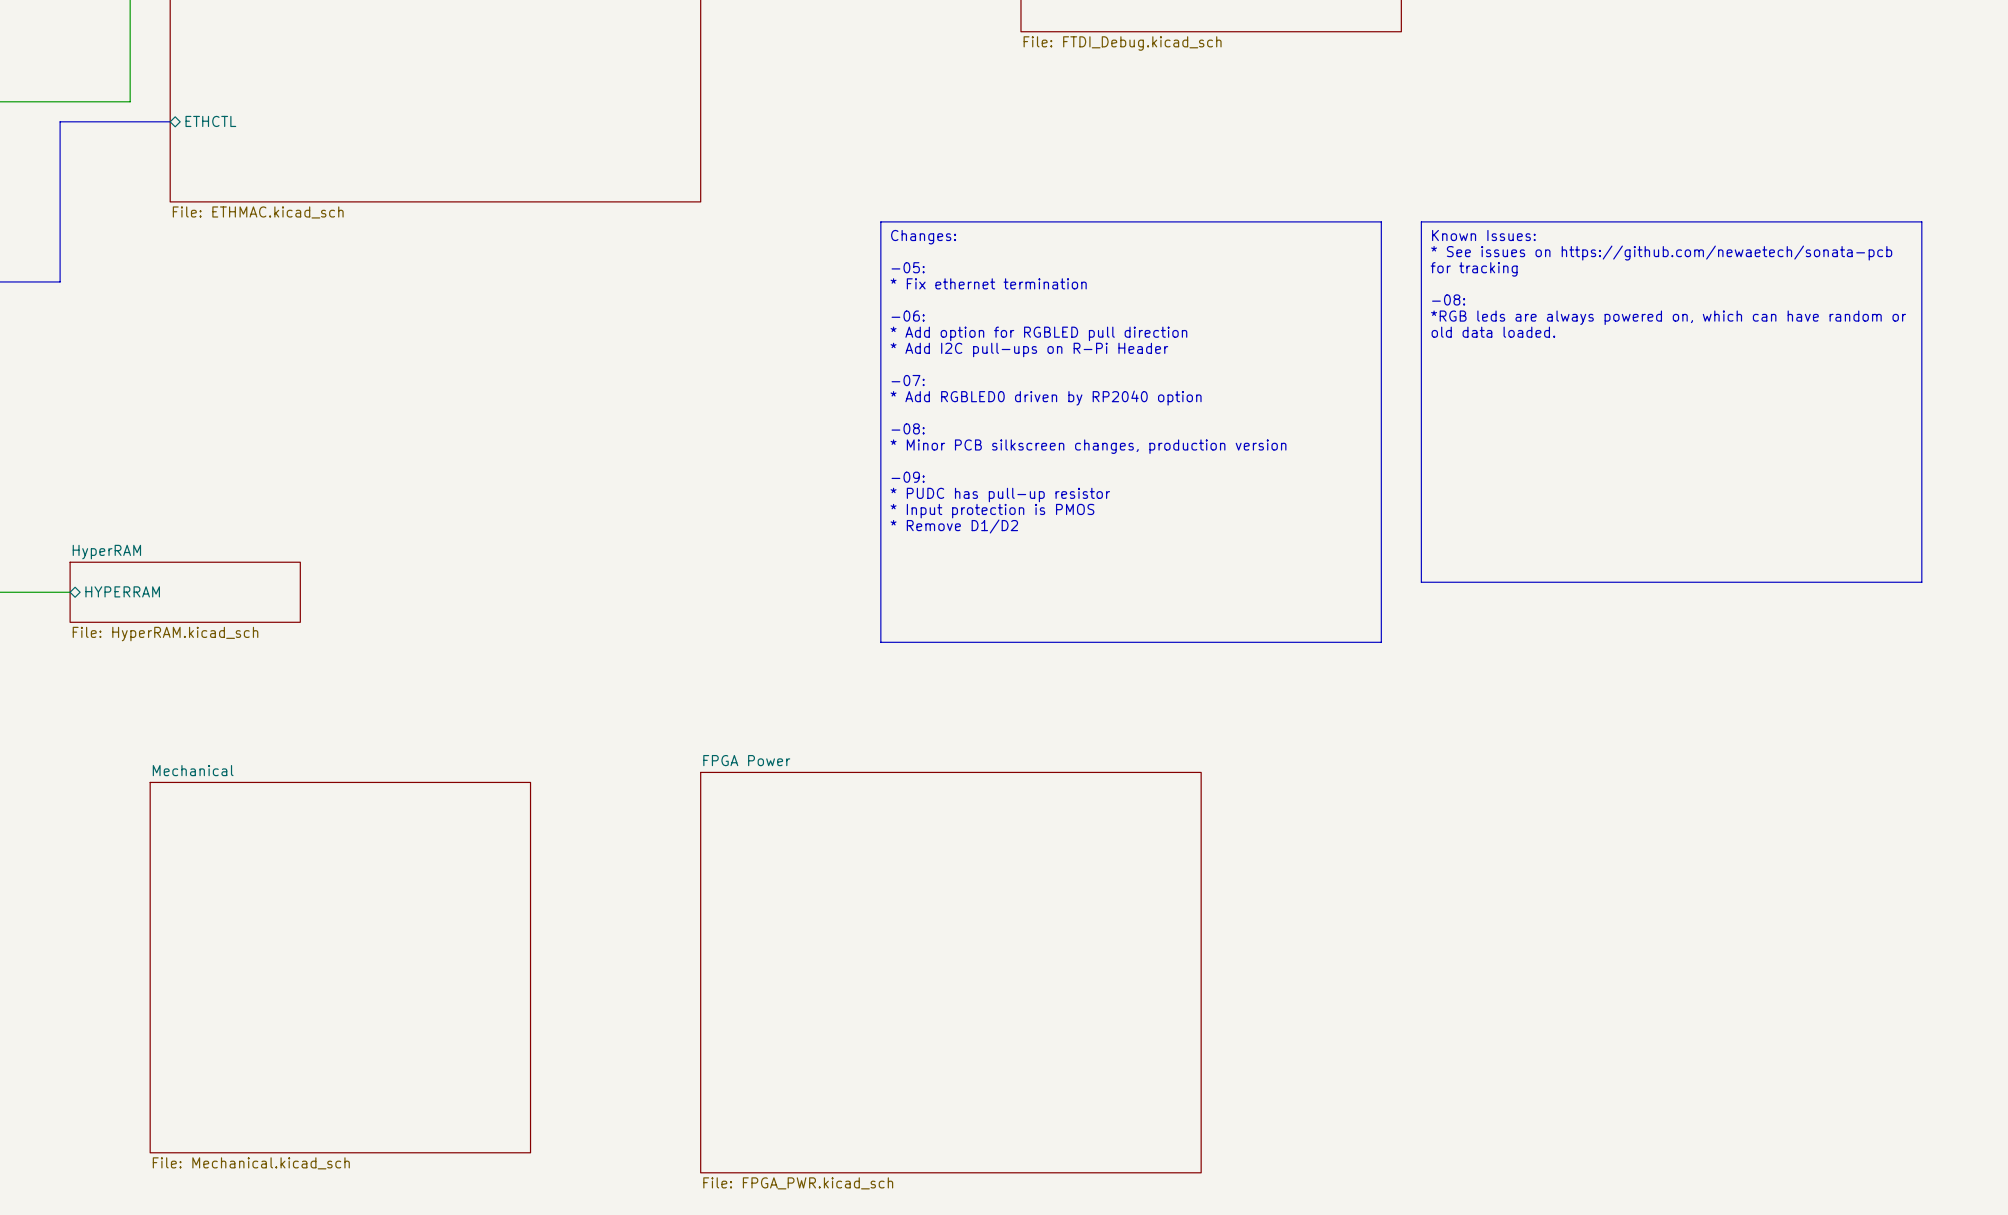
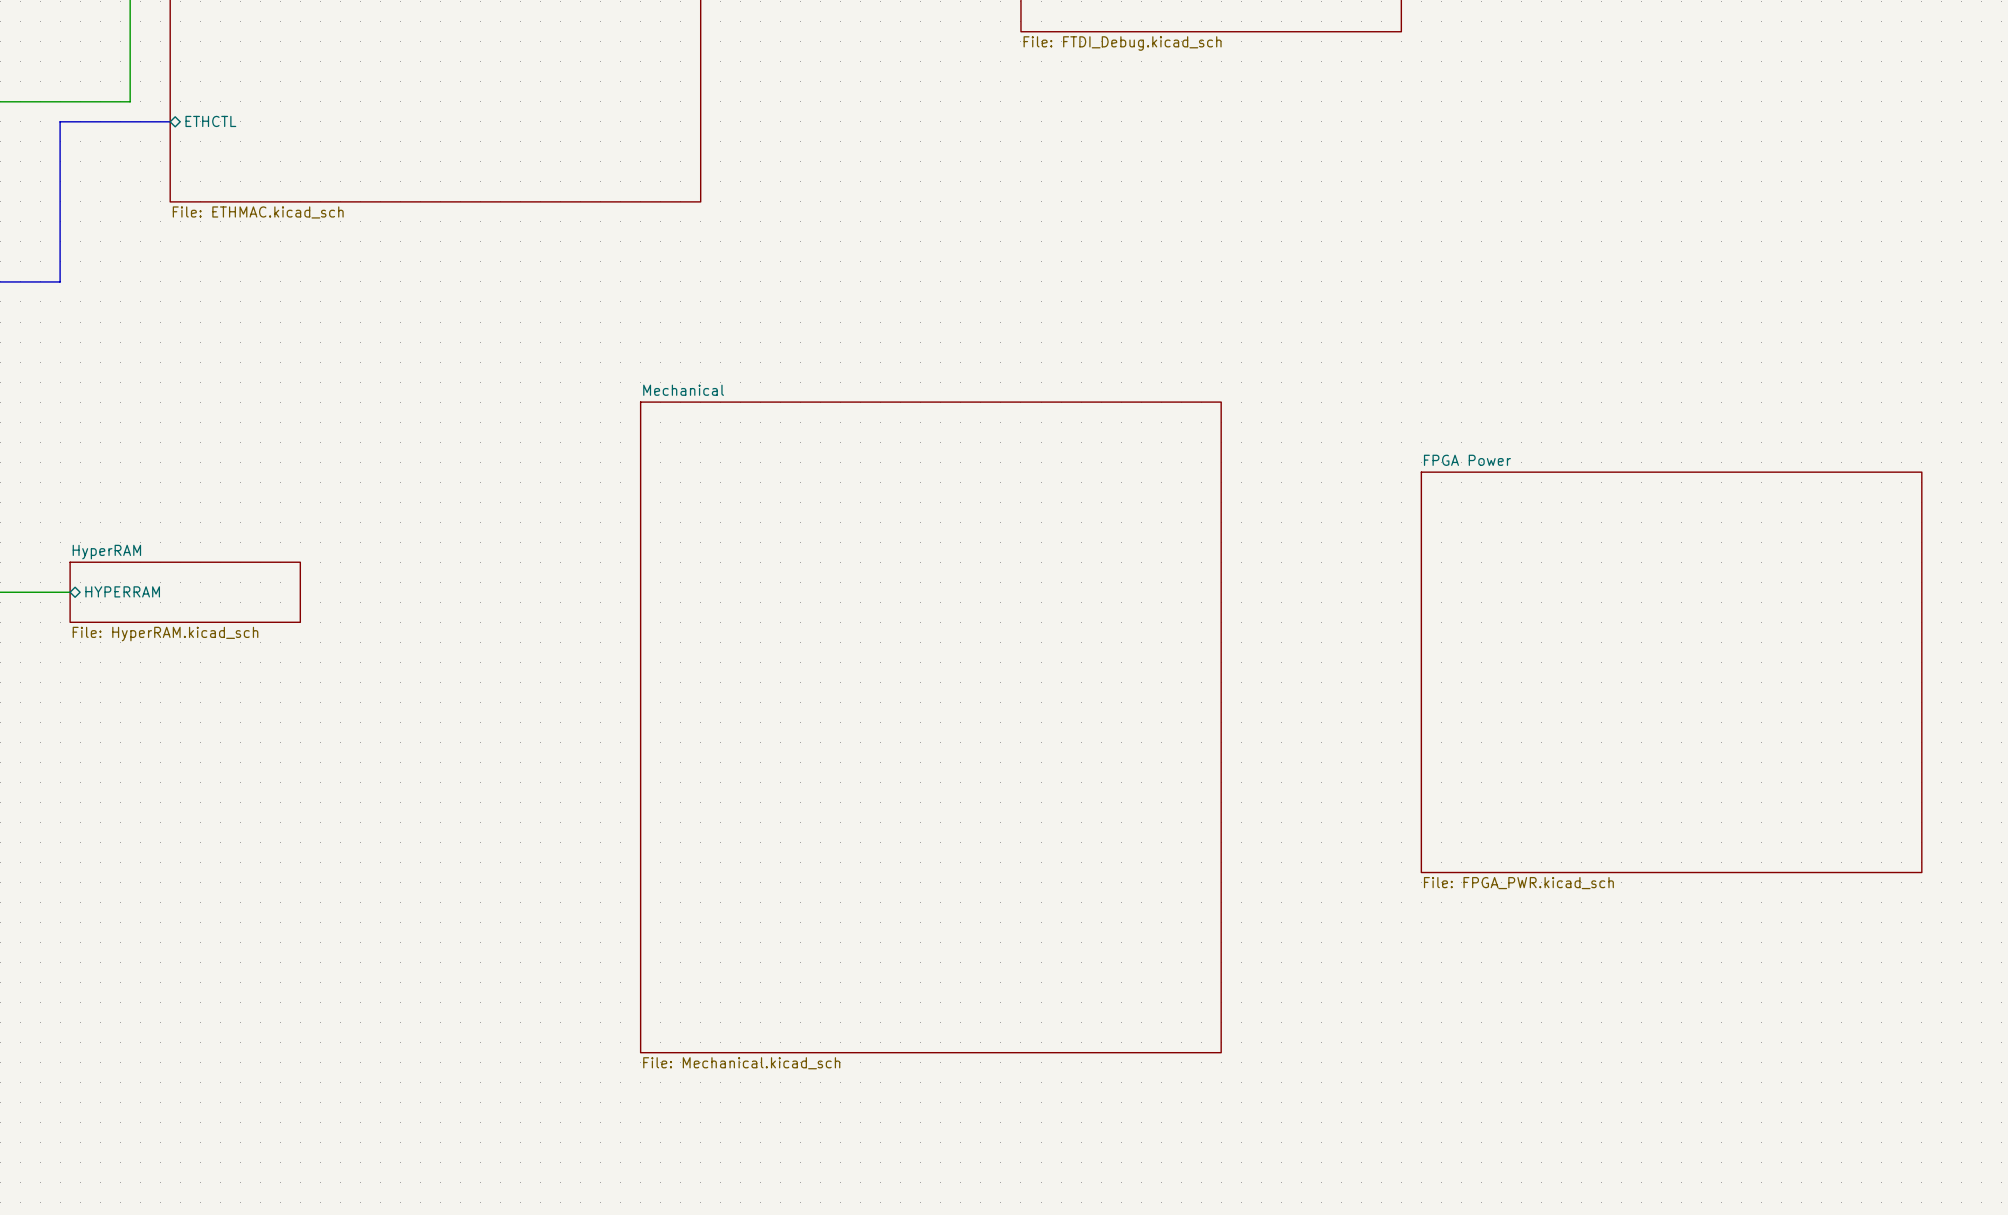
line: (880, 221) (1381, 221) (1381, 642) (880, 642) (880, 221) -> none
line: (1421, 221) (1921, 221) (1921, 582) (1421, 582) (1421, 221) -> none
text: Known Issues: (1483, 235) -> none
text: Changes: (923, 237) -> none
text: * See issues on https://github.com/newaetech/sonata-pcb (1661, 253) -> none
text: -05: (908, 267) -> none
text: for tracking (1474, 269) -> none
text: * Fix ethernet termination (988, 283) -> none
text: -08: (1448, 299) -> none
text: -06: (908, 316) -> none
text: *RGB leds are always powered on, which can have random or (1668, 317) -> none
text: old data loaded. (1493, 332) -> none
text: * Add option for RGBLED pull direction (1038, 333) -> none
text: * Add I2C pull-ups on R-Pi Header (1029, 349) -> none
text: -07: (908, 380) -> none
text: * Add RGBLED0 driven by RP2040 option (1046, 398) -> none
text: -08: (908, 428) -> none
text: * Minor PCB silkscreen changes, production version (1088, 446) -> none
text: -09: (908, 477) -> none
text: * PUDC has pull-up resistor (1000, 495) -> none
text: * Input protection is PMOS (992, 511) -> none
text: * Remove D1/D2 (954, 526) -> none
sheet FPGA Power: none -> File: FPGA_PWR.kicad_sch (1671, 672)
sheet Mechanical: none -> File: Mechanical.kicad_sch (930, 727)
sheet Mechanical: File: Mechanical.kicad_sch (340, 967) -> none
sheet FPGA Power: File: FPGA_PWR.kicad_sch (950, 972) -> none

